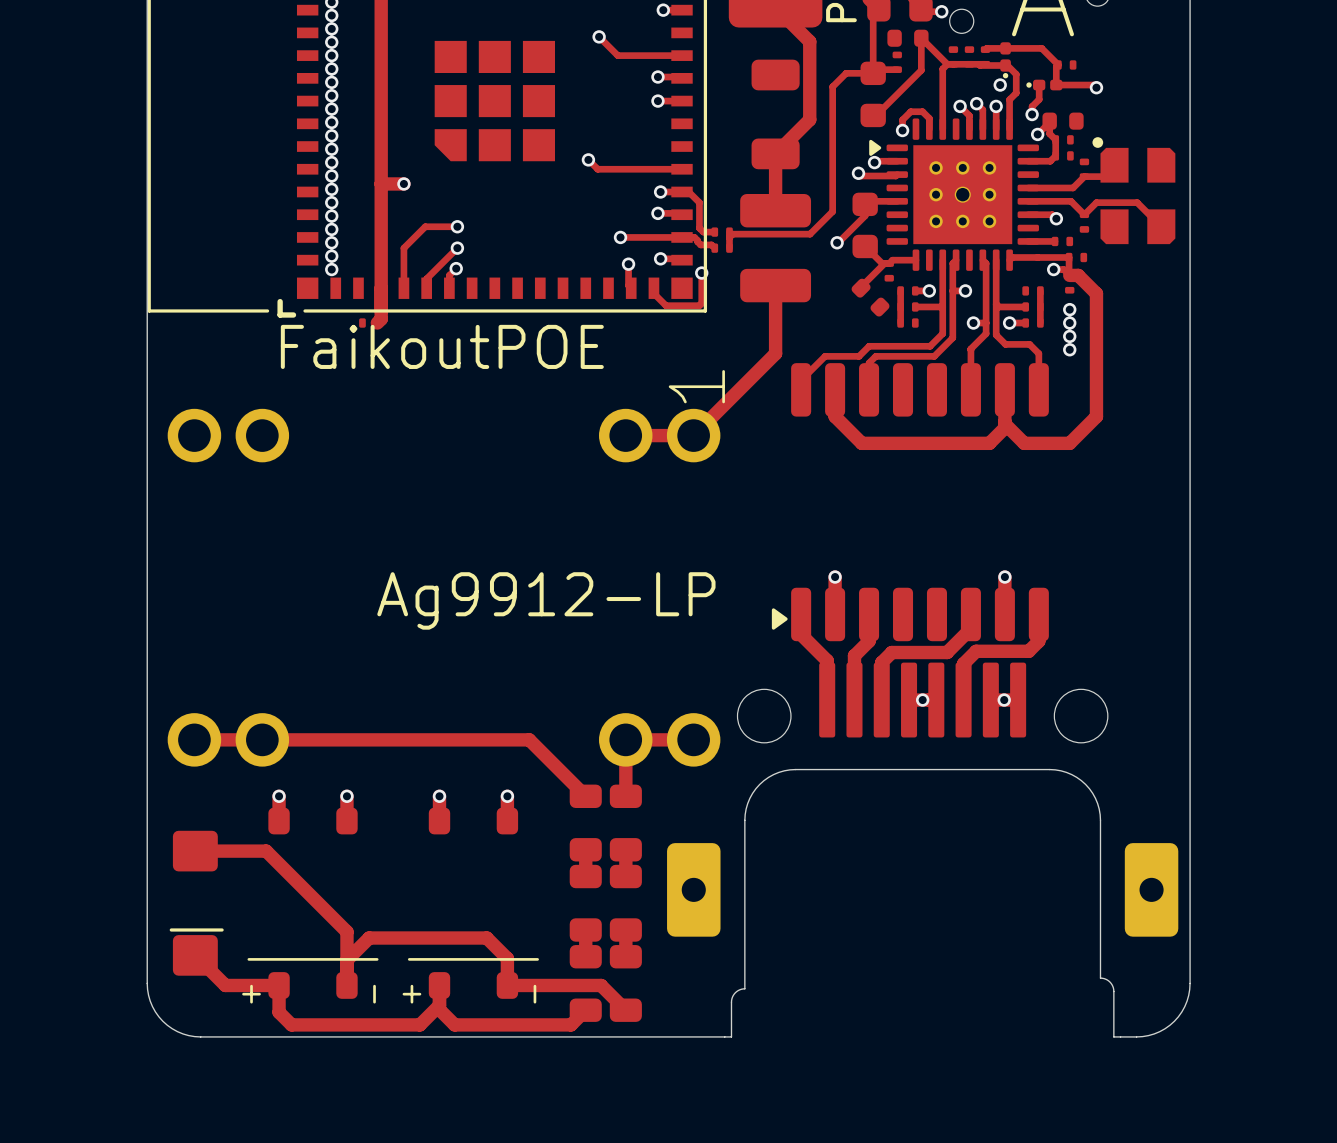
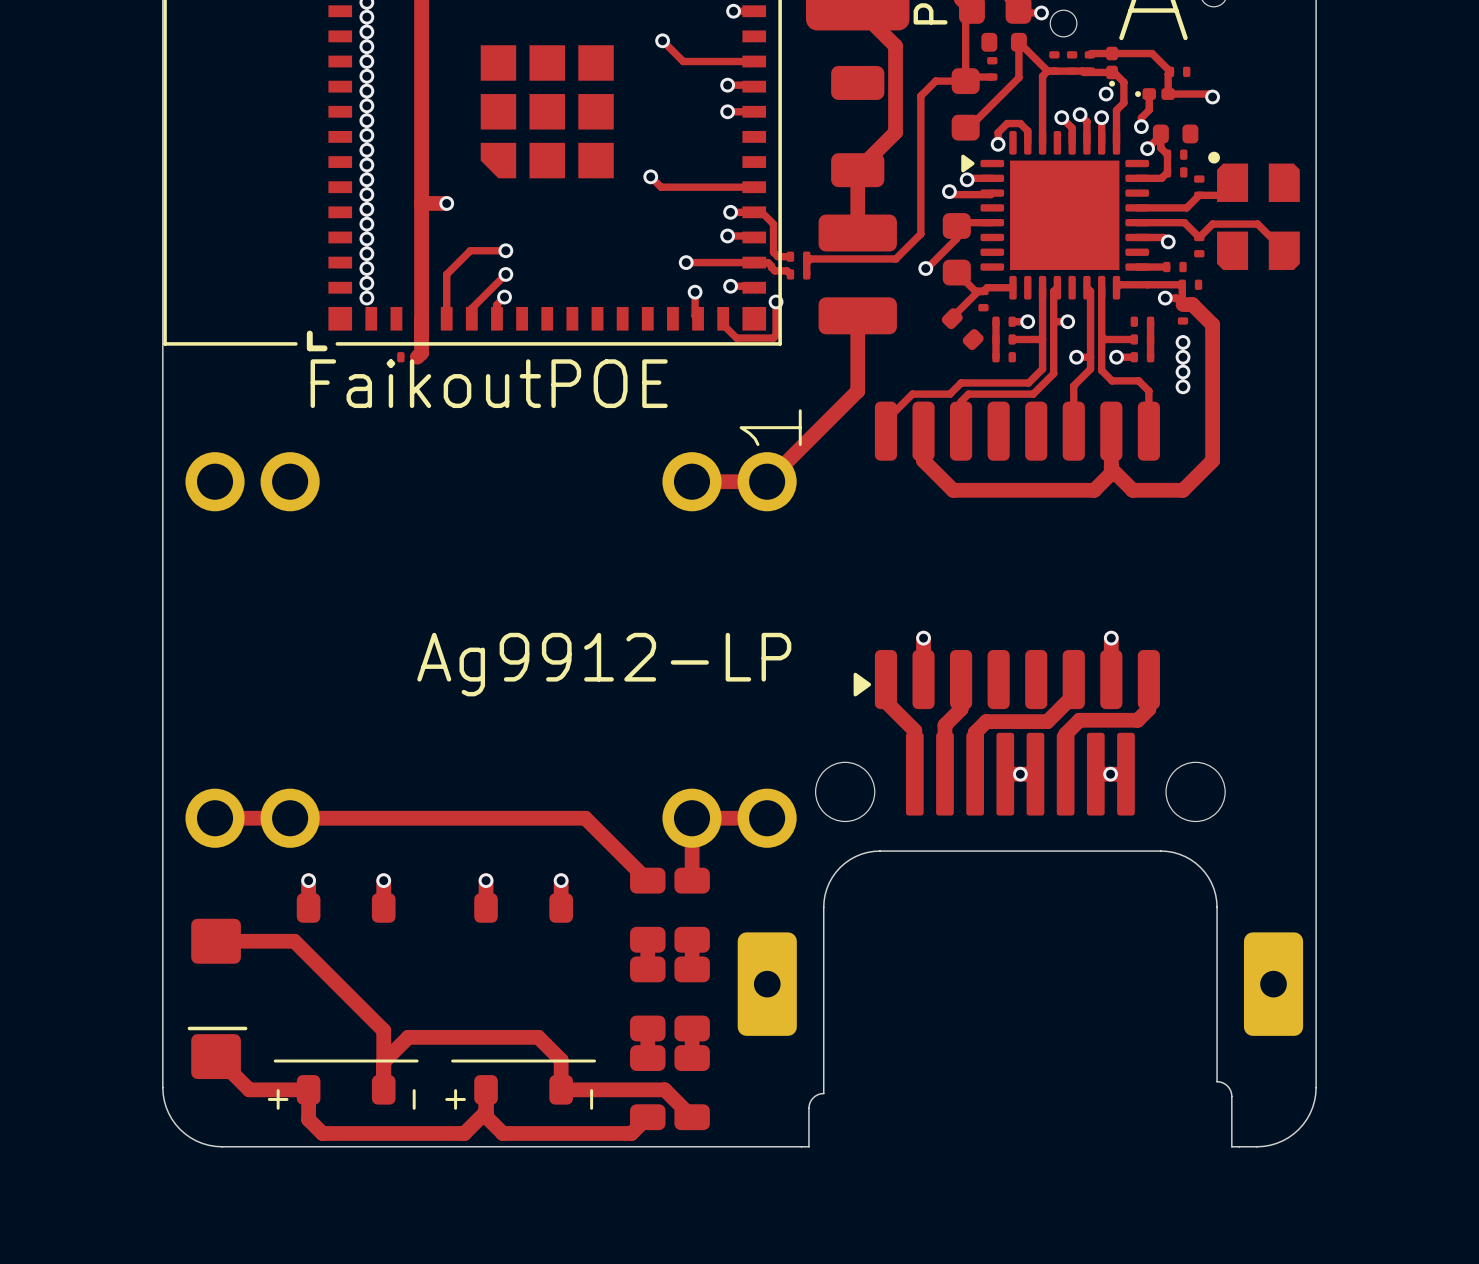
part footprint: [869, 118, 1039, 271] -> [961, 131, 1150, 300]

